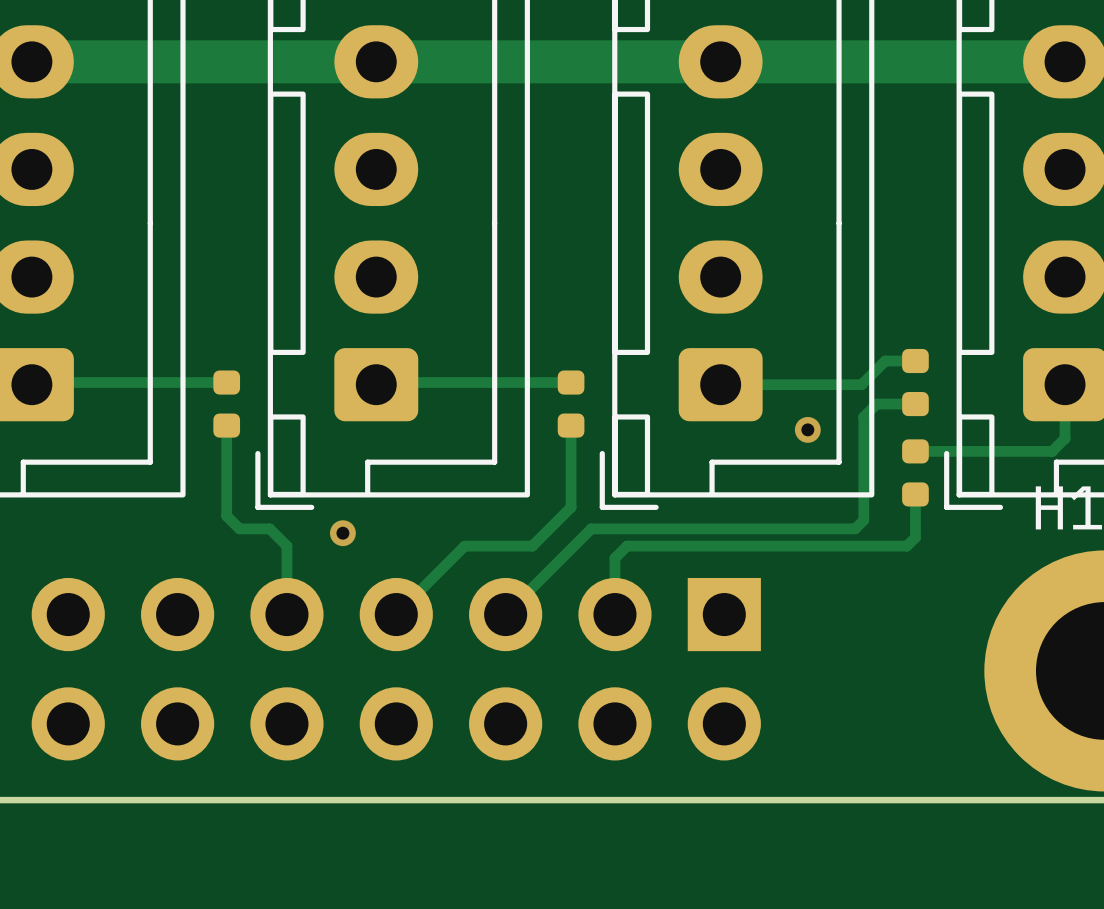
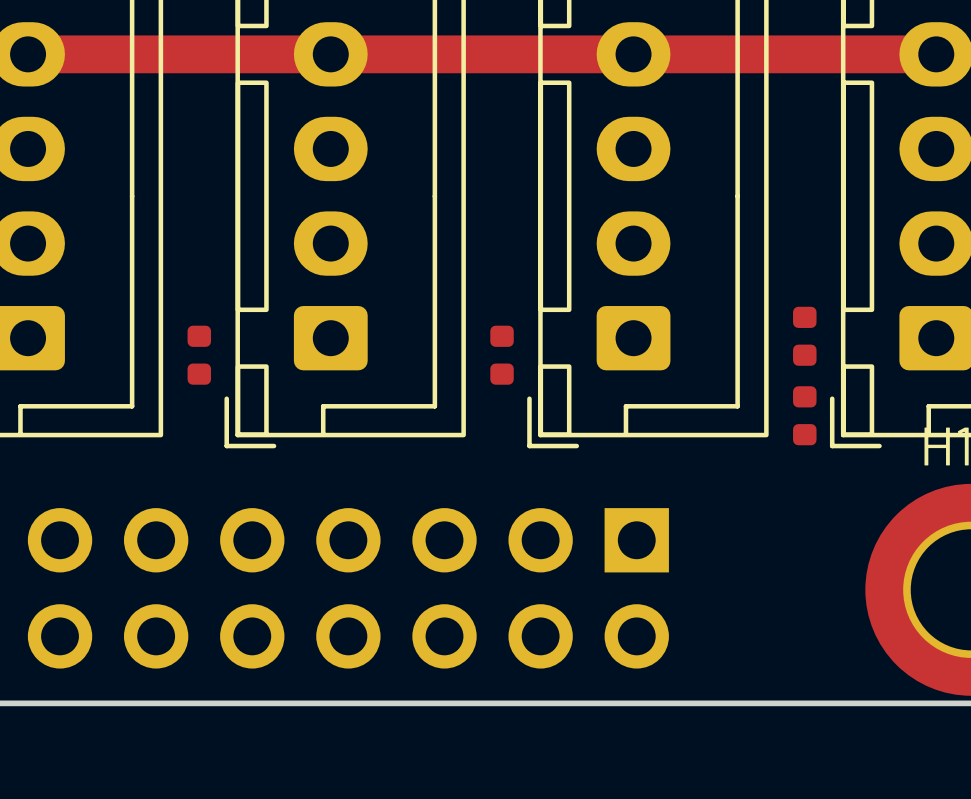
track: (915, 361) (885, 361) (861, 384) (720, 384) -> none
track: (226, 382) (34, 382) (31, 384) -> none
track: (571, 382) (378, 382) (376, 384) -> none
track: (1065, 384) (1065, 438) (1052, 451) (915, 451) -> none
track: (915, 404) (876, 404) (863, 416) (863, 520) (855, 528) (591, 528) (505, 614) -> none
track: (226, 425) (226, 515) (239, 528) (269, 528) (286, 546) (286, 614) -> none
track: (571, 425) (571, 507) (532, 546) (464, 546) (396, 614) -> none
via: (807, 429) -> none
track: (915, 494) (915, 537) (906, 546) (627, 546) (614, 558) (614, 614) -> none
via: (342, 533) -> none

